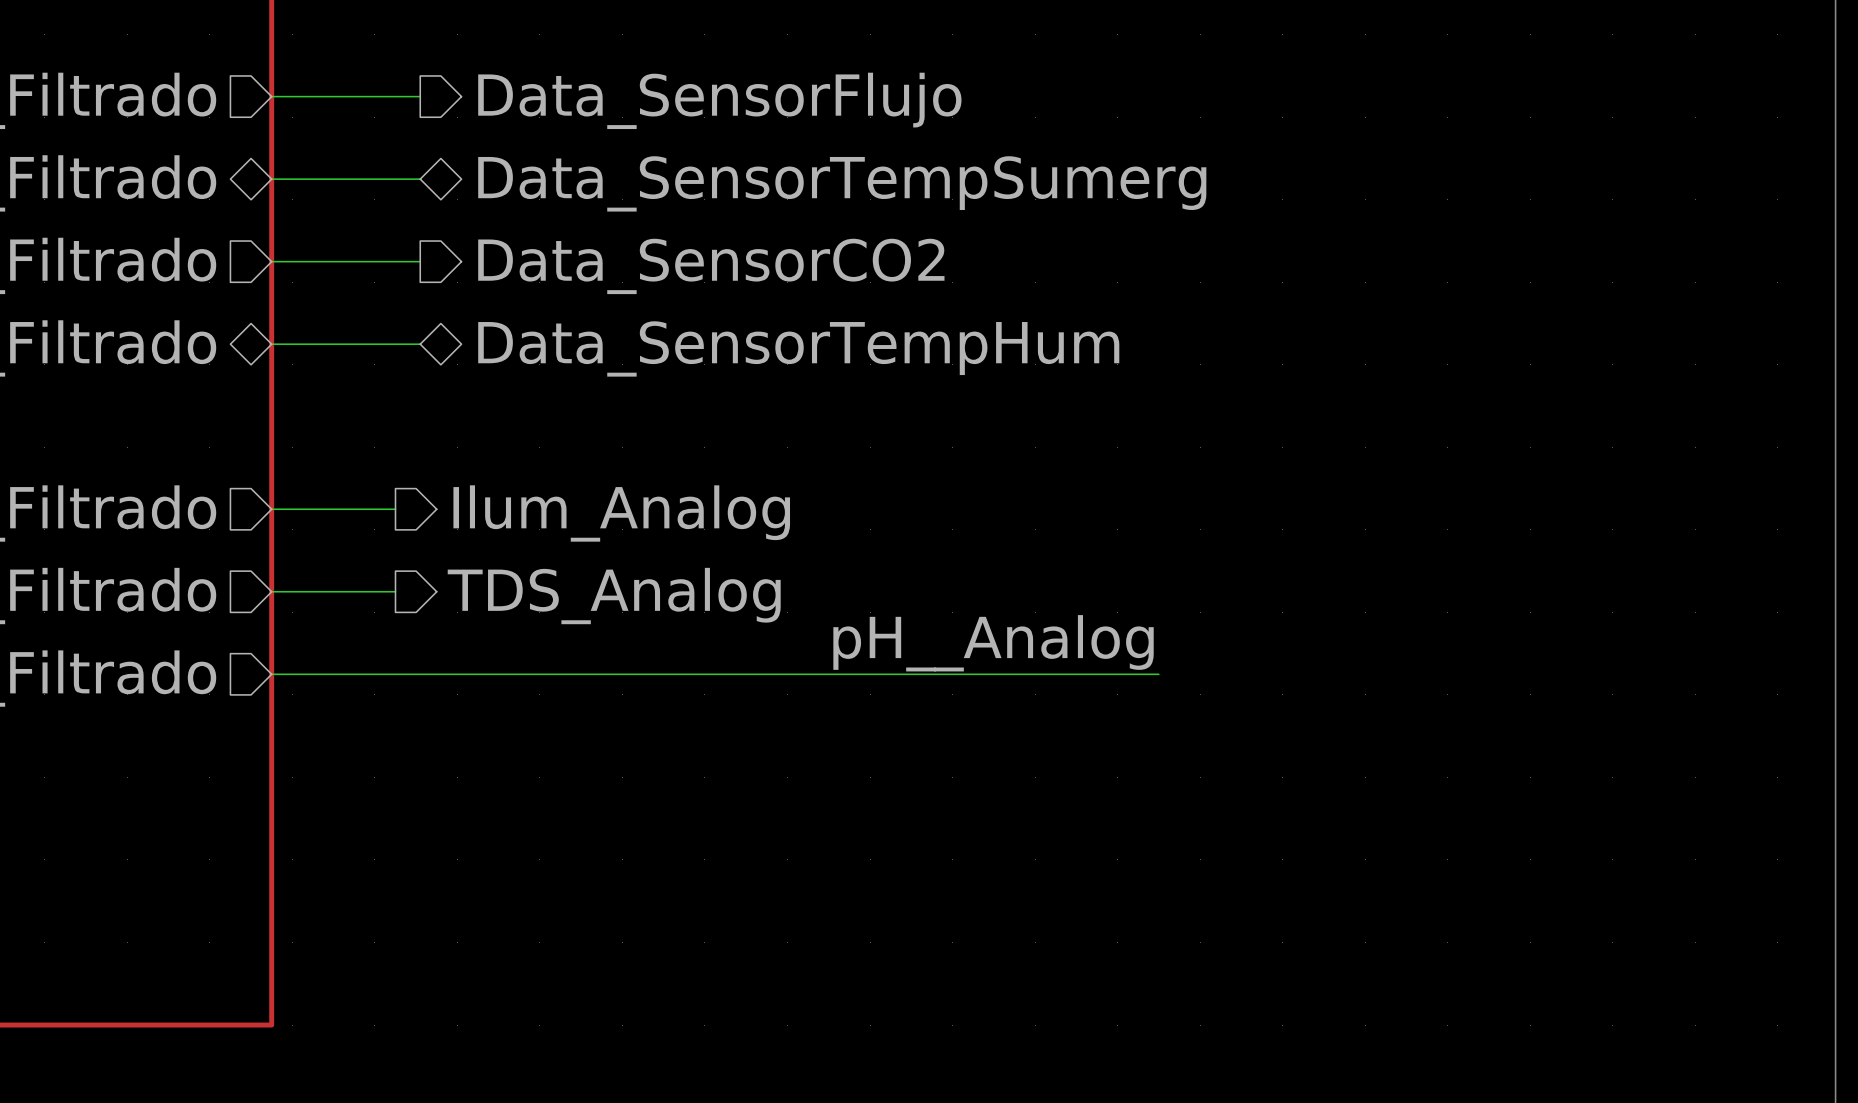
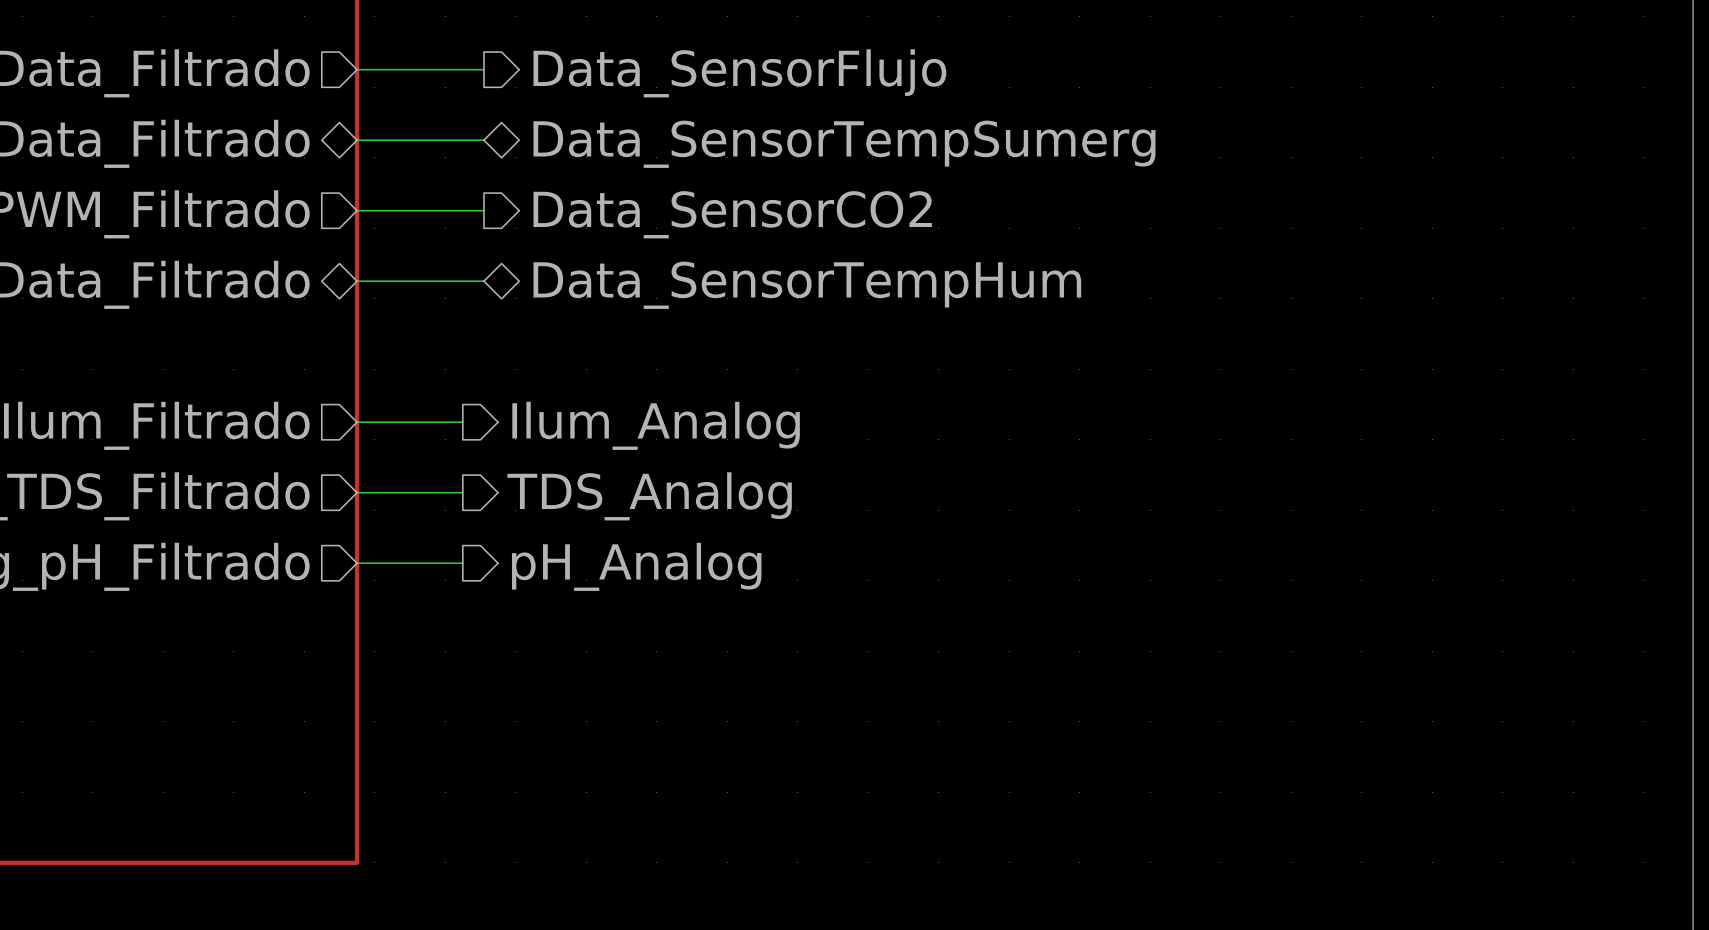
label: pH__Analog (993, 643) -> none
wire: (395, 674) (1158, 674) -> none
hierarchical label: none -> pH_Analog (636, 566)

